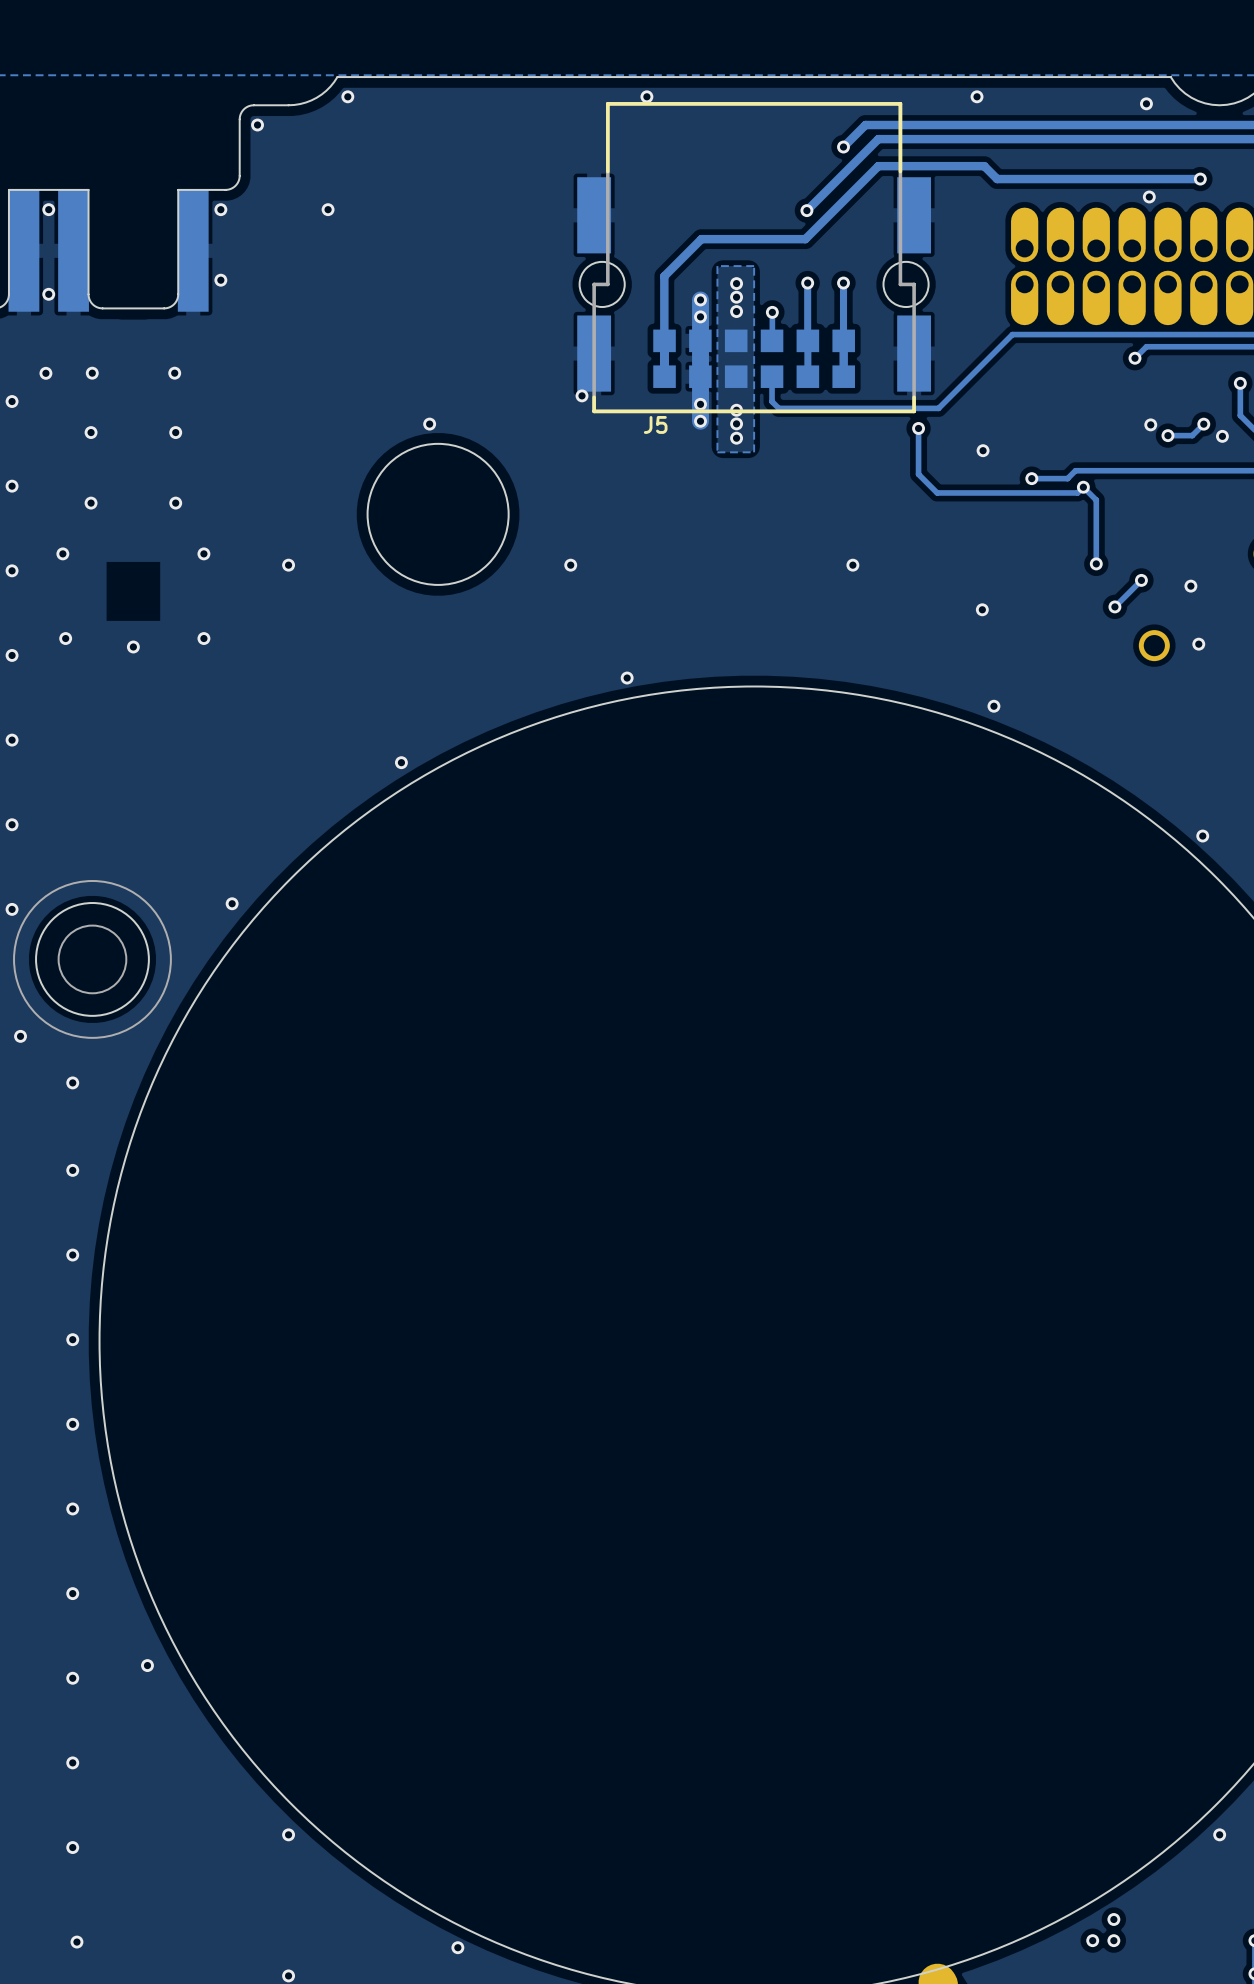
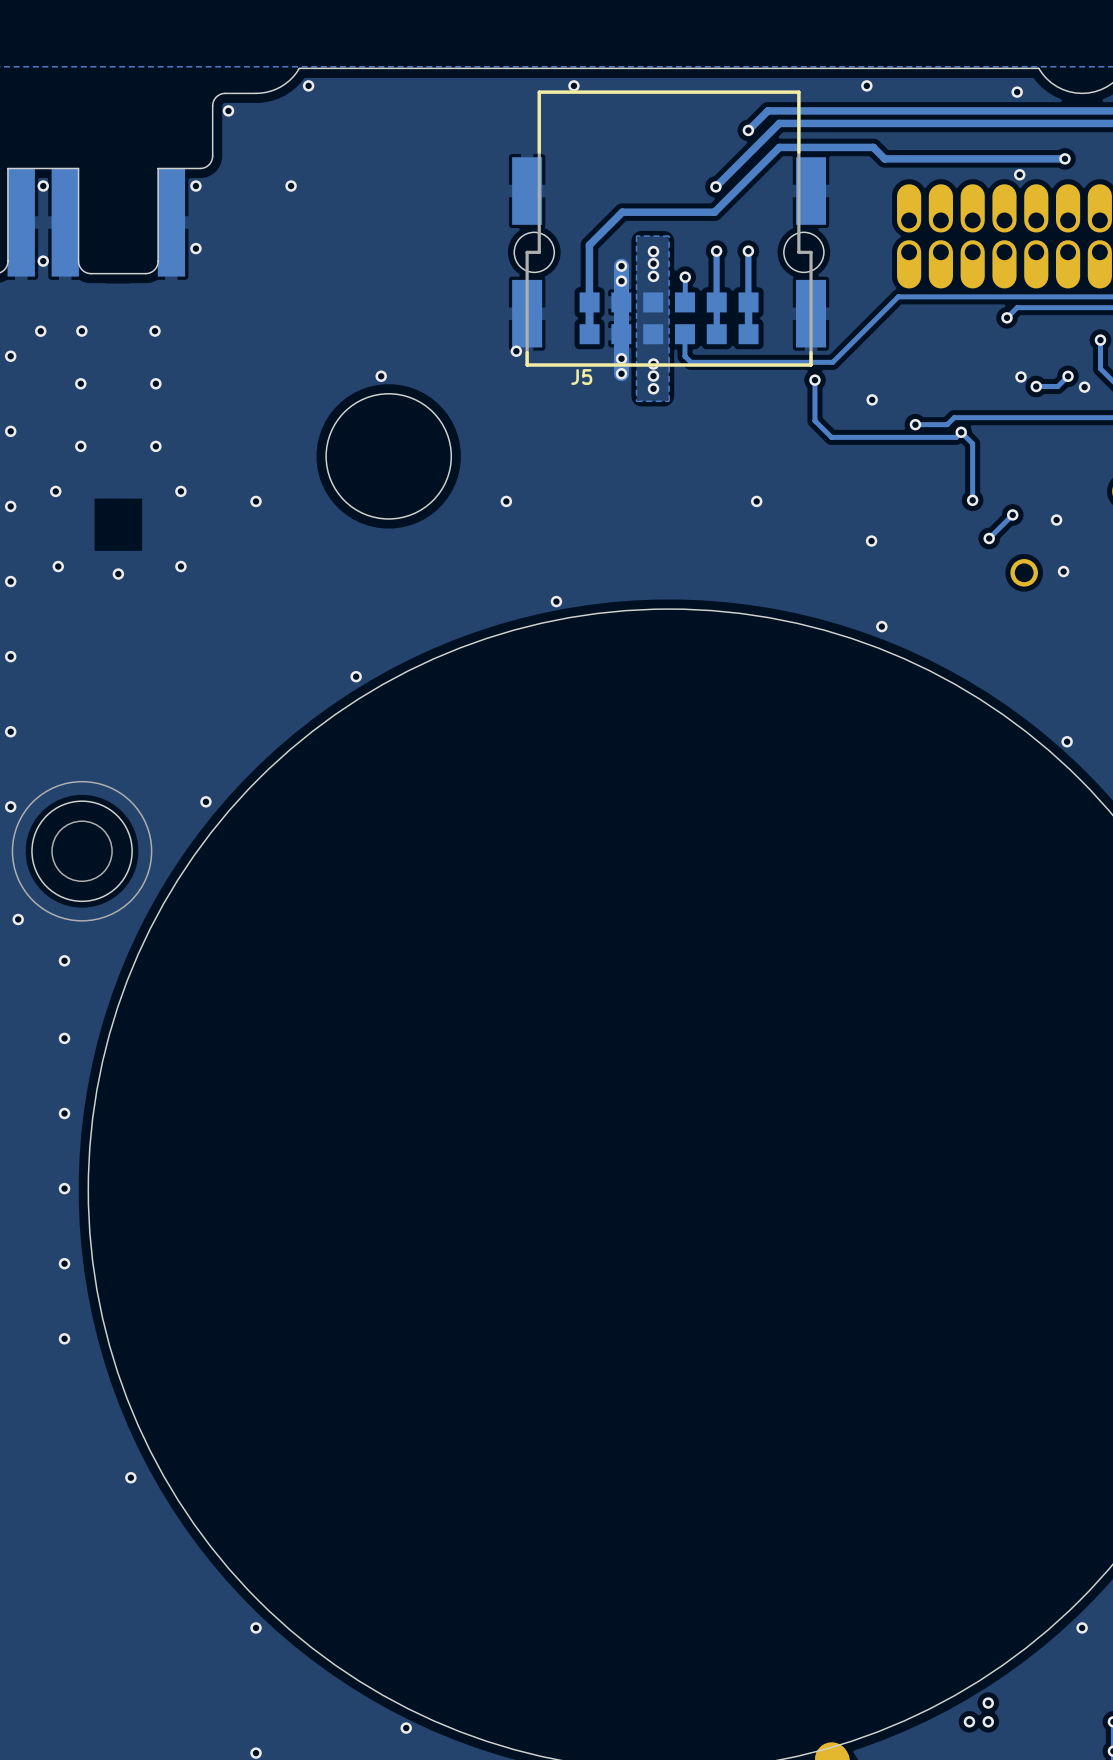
via: (72, 1593) -> none
via: (72, 1678) -> none
via: (72, 1762) -> none
via: (72, 1847) -> none
via: (76, 1942) -> none

